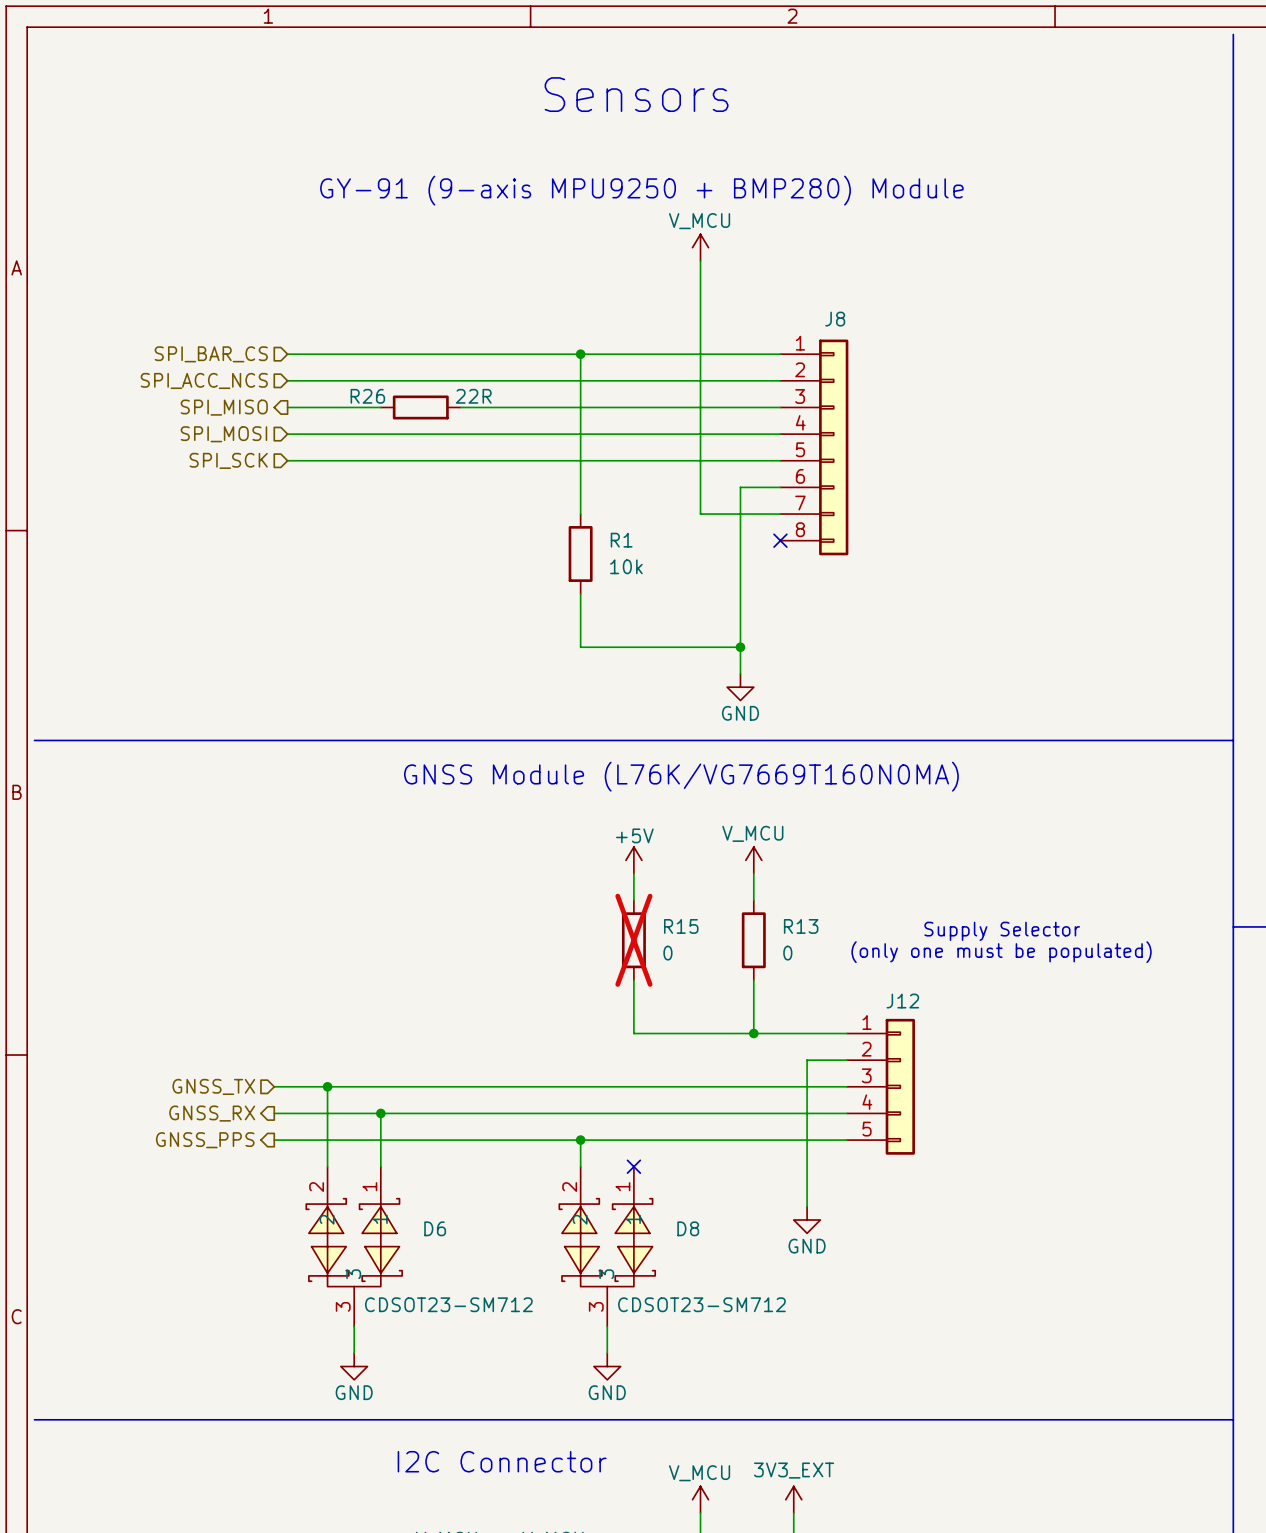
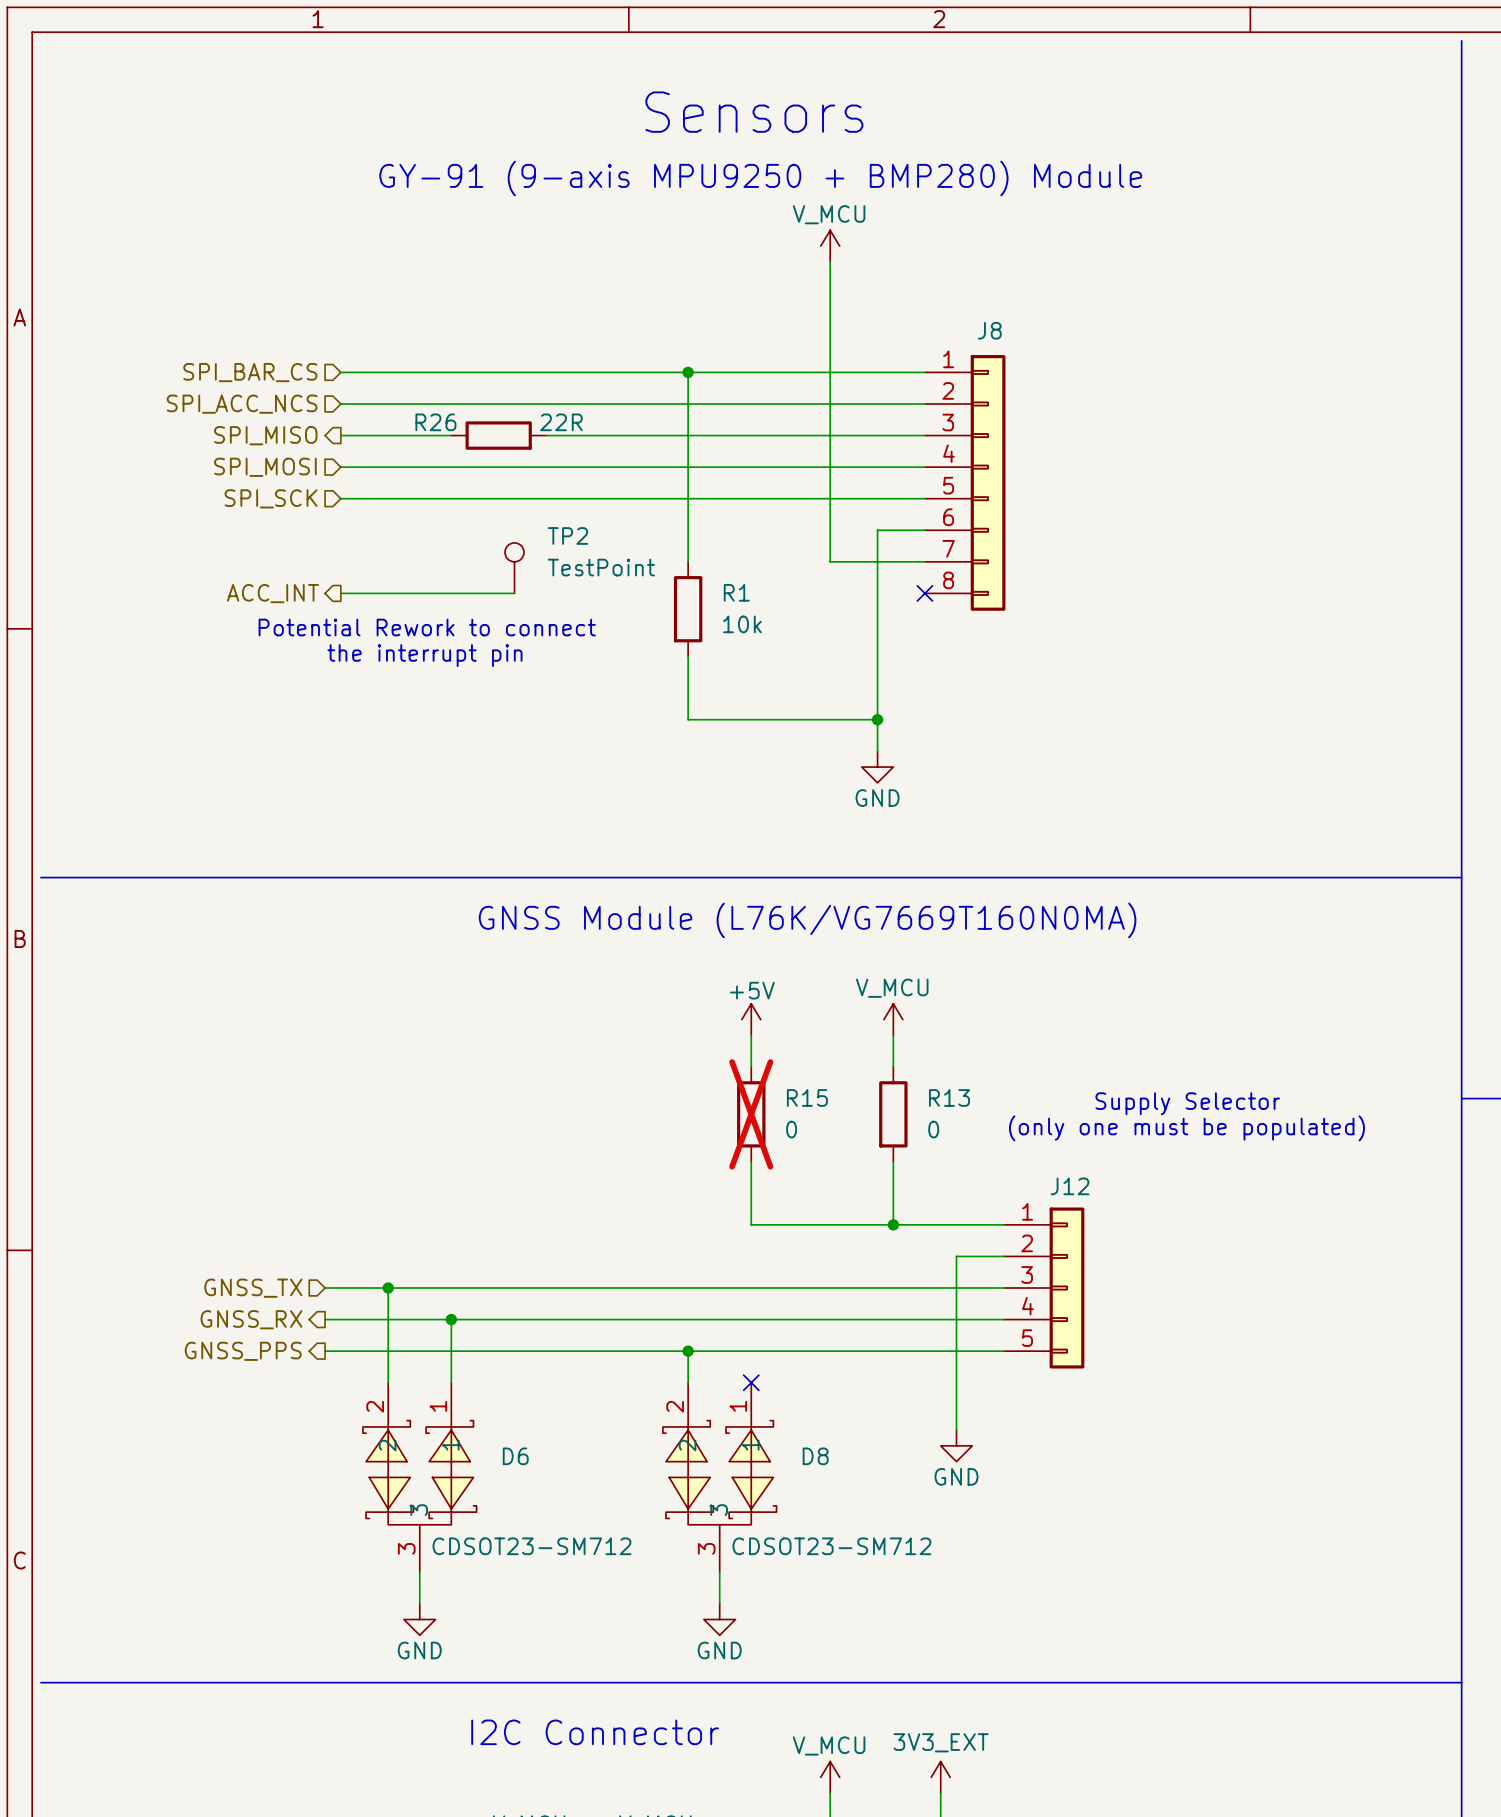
text position: GY-91 (9-axis MPU9250 + BMP280) Module (641, 190) -> GY-91 (9-axis MPU9250 + BMP280) Module (760, 178)
power symbol position: V_MCU (700, 247) -> V_MCU (830, 246)
wire: none -> (688, 372) (688, 419)
hierarchical label position: SPI_BAR_CS (211, 354) -> SPI_BAR_CS (250, 372)
wire: (287, 354) (780, 354) -> (340, 372) (924, 372)
junction position: (580, 354) -> (688, 372)
hierarchical label position: SPI_ACC_NCS (204, 380) -> SPI_ACC_NCS (242, 404)
wire: (287, 380) (780, 380) -> (340, 403) (924, 403)
hierarchical label position: SPI_MISO (224, 407) -> SPI_MISO (265, 435)
wire: (287, 407) (380, 407) -> (340, 435) (451, 435)
R26 position: (420, 407) -> (498, 435)
wire: (460, 407) (780, 407) -> (546, 435) (924, 435)
hierarchical label position: SPI_MOSI (223, 434) -> SPI_MOSI (265, 467)
wire: (287, 434) (780, 434) -> (340, 467) (924, 467)
J8 position: (814, 447) -> (965, 482)
hierarchical label position: SPI_SCK (228, 460) -> SPI_SCK (271, 498)
wire: (287, 460) (780, 460) -> (340, 498) (924, 498)
wire: (580, 474) (580, 514) -> (688, 656) (688, 703)
wire: (700, 474) (700, 514) (780, 514) -> (830, 561) (924, 561)
TP2: none -> TestPoint (514, 568)
wire: (740, 487) (780, 487) -> (877, 577) (877, 530) (924, 530)
hierarchical label: none -> ACC_INT (272, 593)
wire: none -> (340, 593) (514, 593)
text: none -> Potential Rework to connect (427, 627)
no-connect mark position: (780, 540) -> (924, 593)
text: none -> the interrupt pin (424, 655)
R1 position: (580, 553) -> (688, 609)
wire: (580, 607) (580, 647) (740, 647) -> (688, 719) (877, 719)
wire: (740, 633) (740, 673) -> none
junction position: (740, 647) -> (877, 719)
power symbol position: GND (740, 687) -> GND (877, 767)

